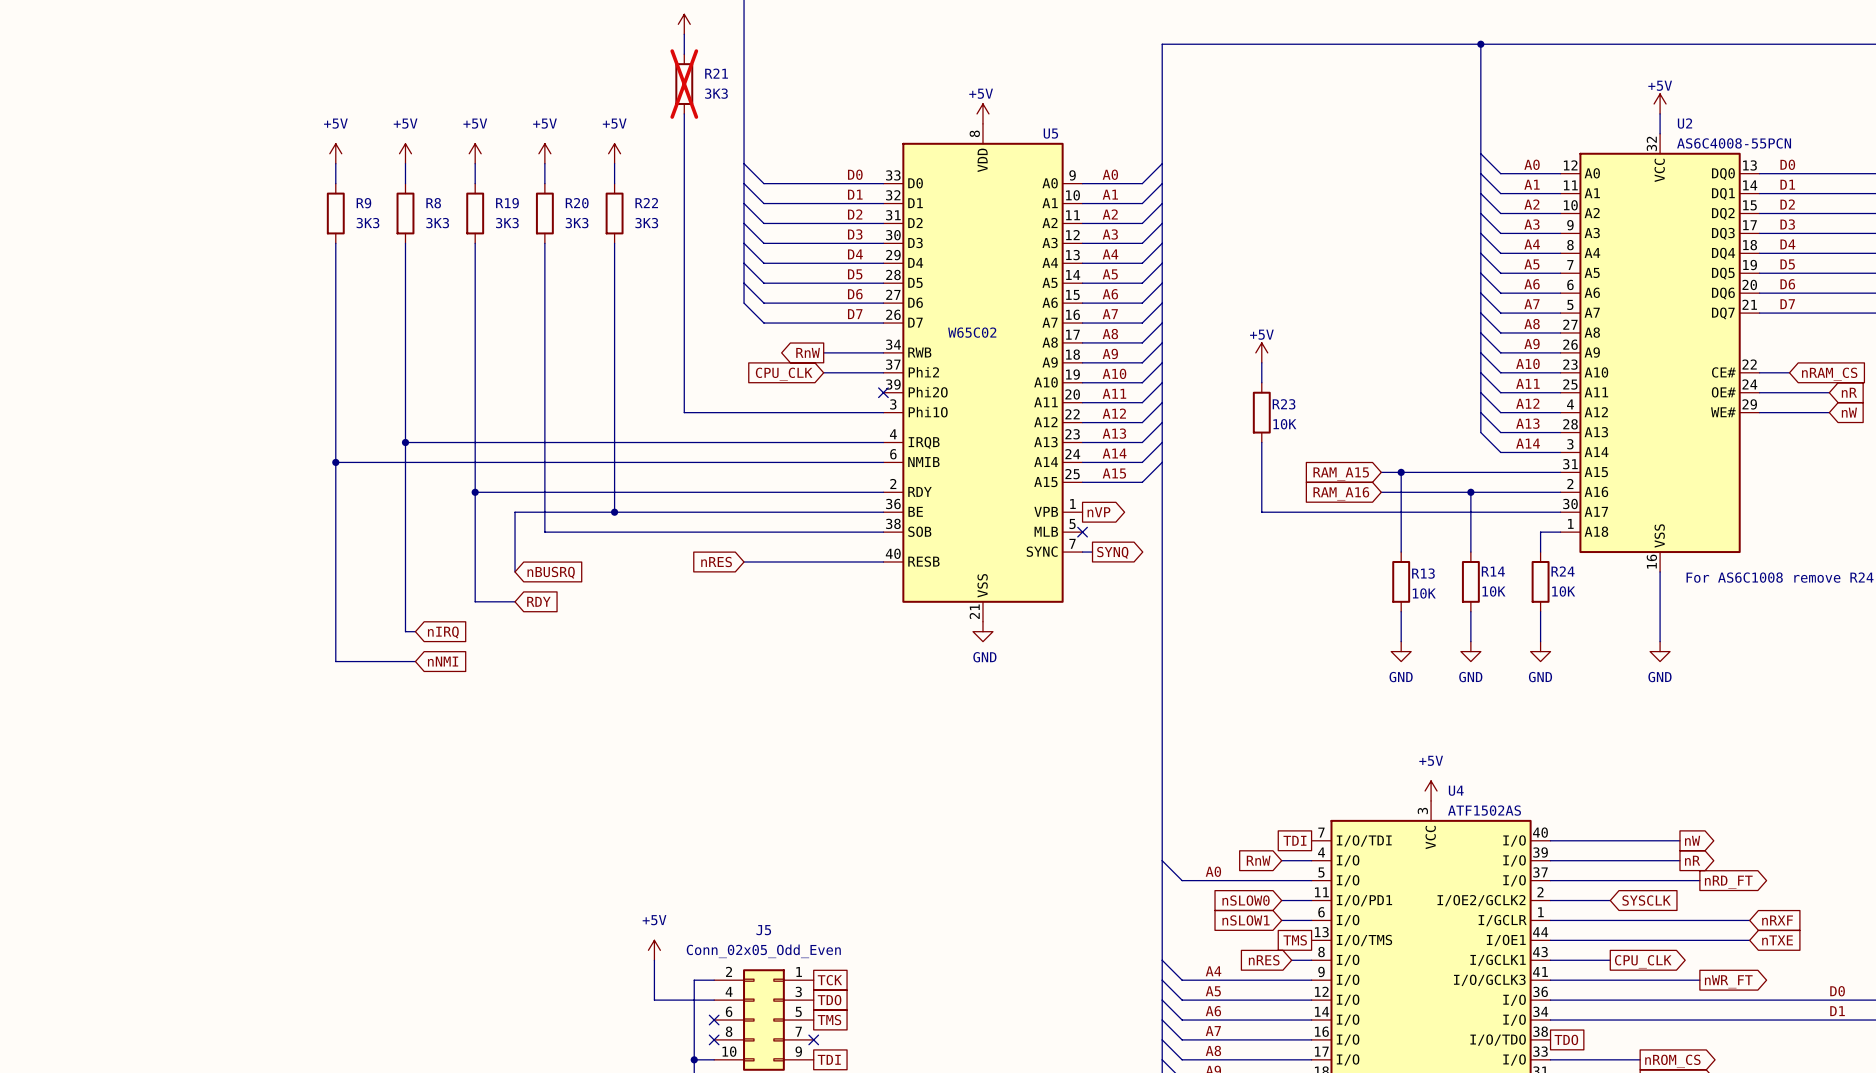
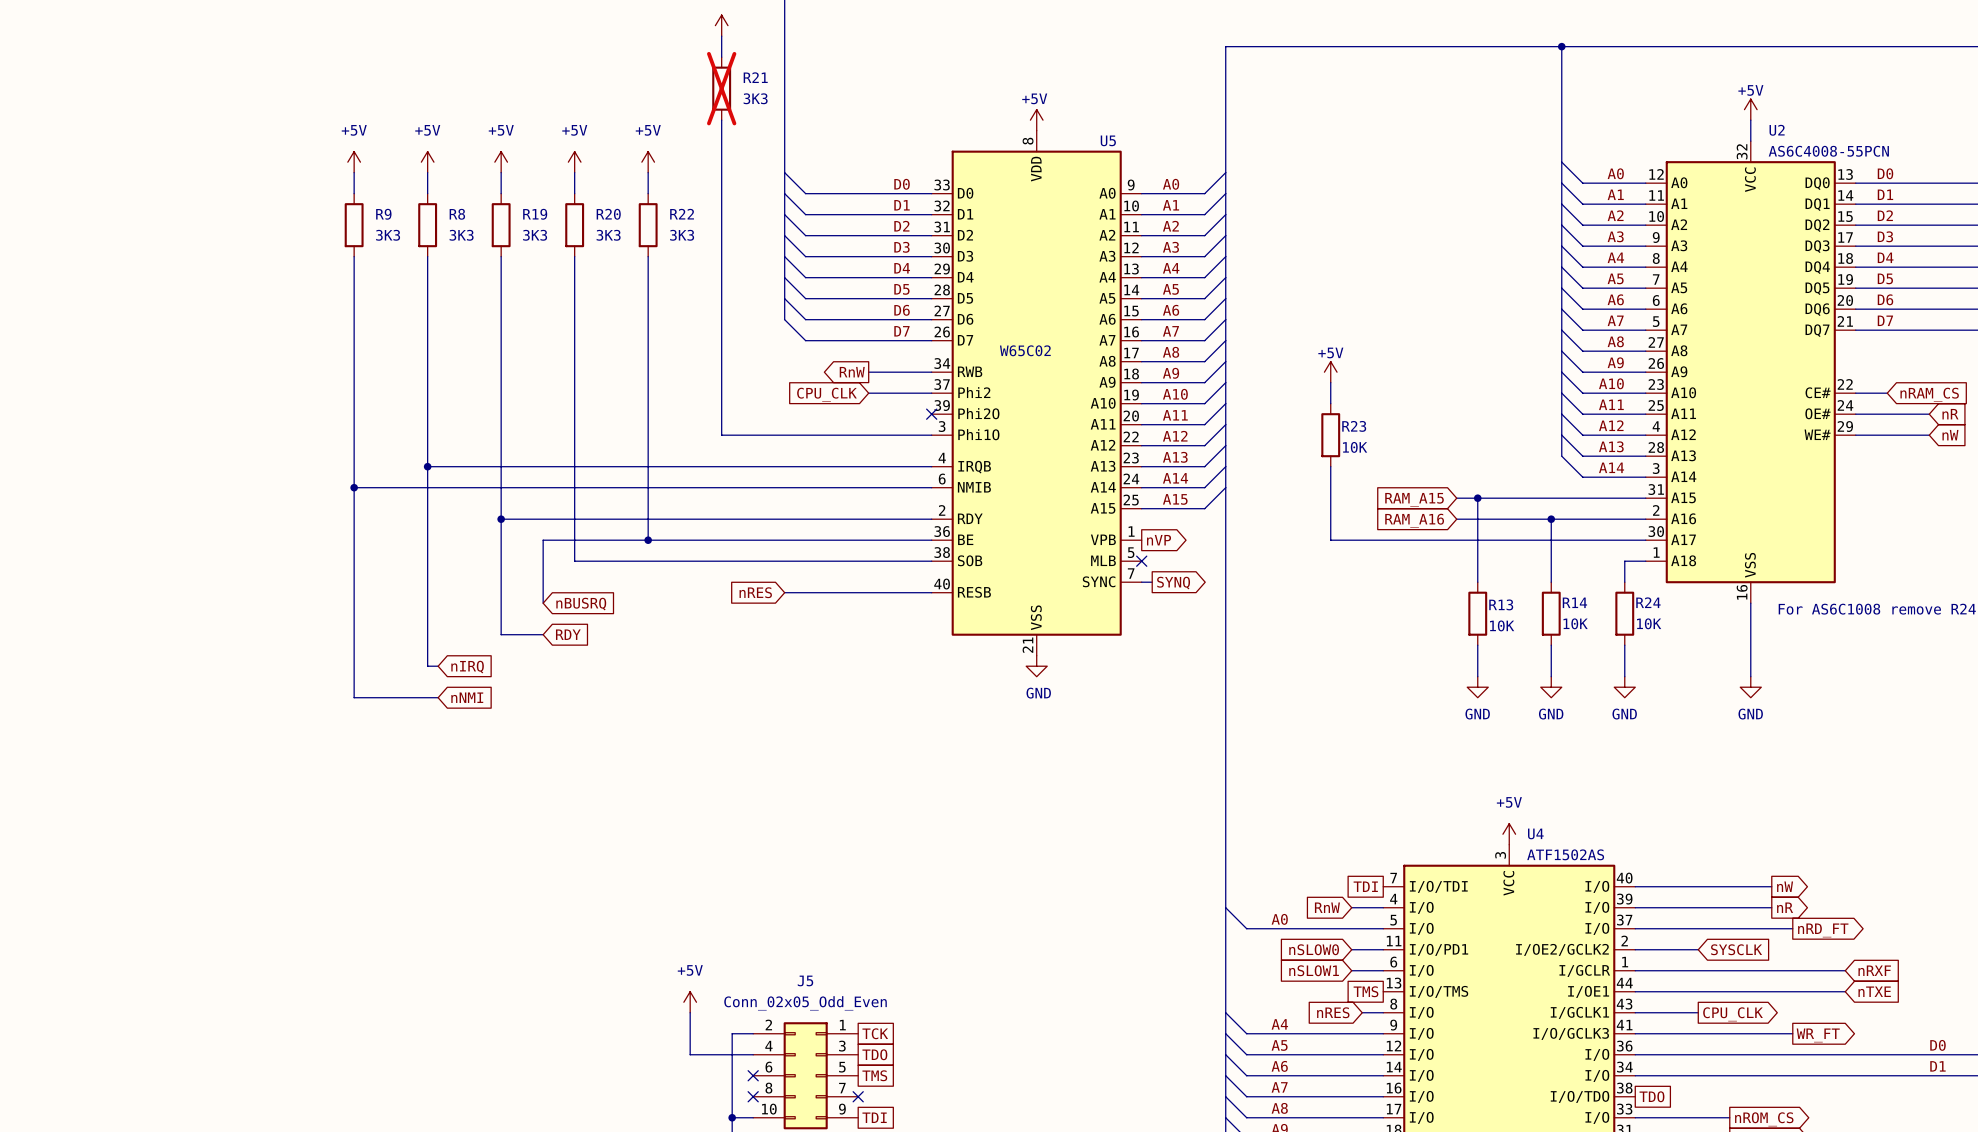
global label: nWR_FT (1728, 981) -> WR_FT (1818, 1035)

